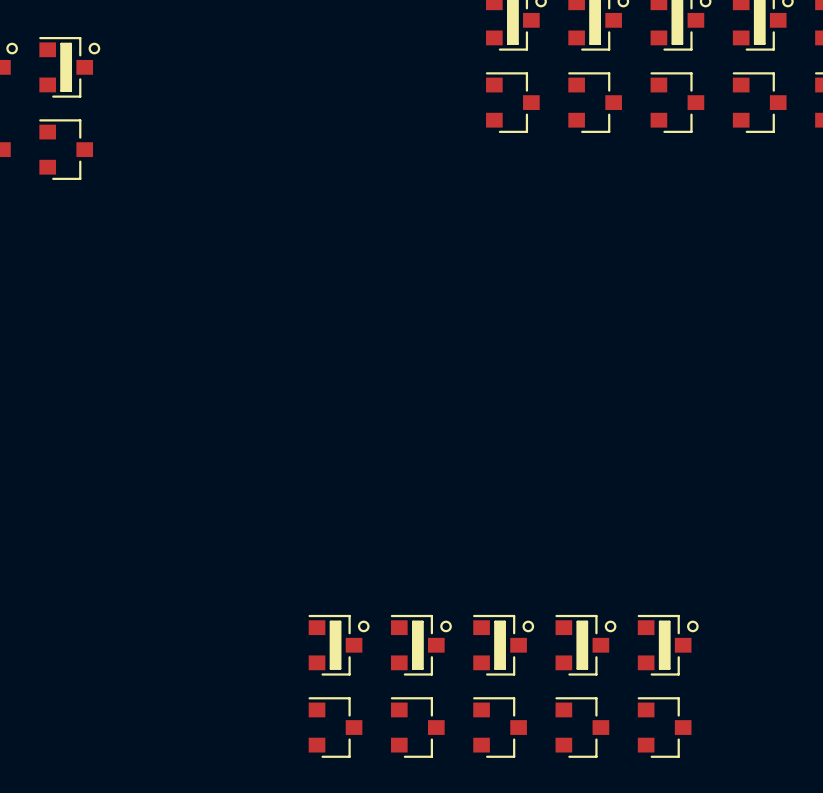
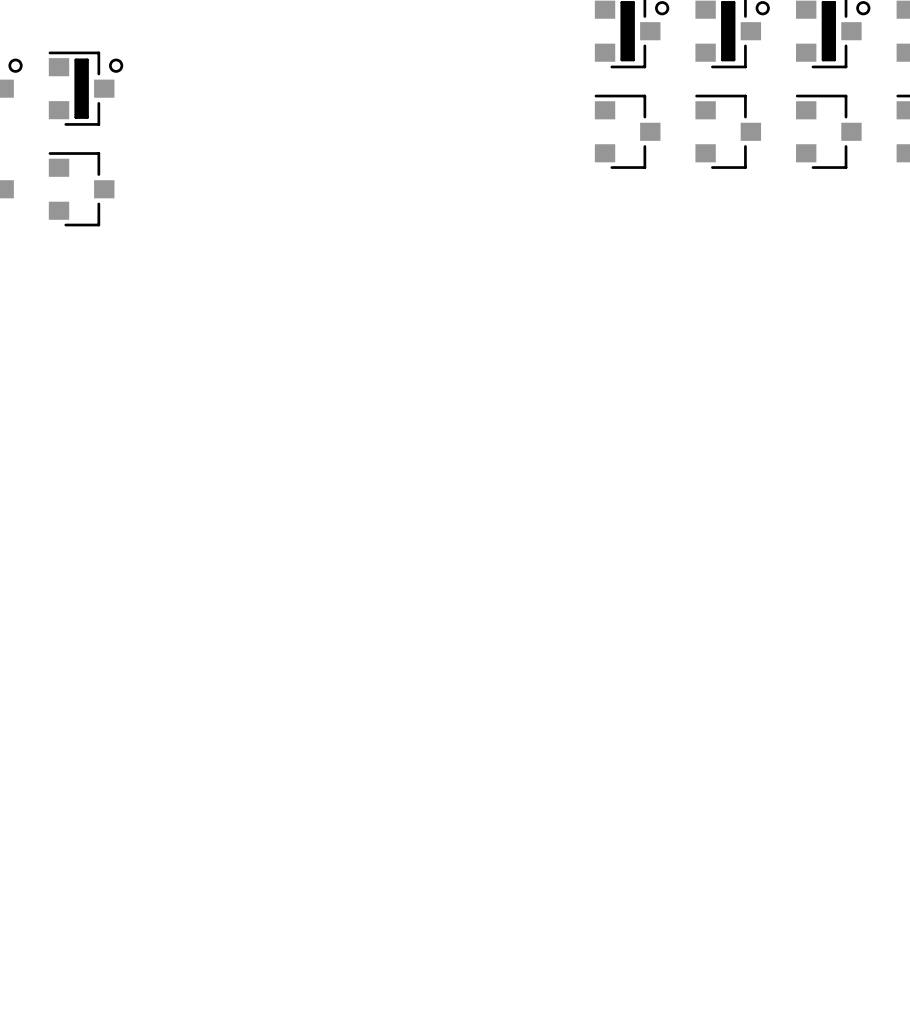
part: (339, 645) -> none
part: (421, 645) -> none
part: (503, 645) -> none
part: (585, 645) -> none
part: (668, 645) -> none
part: (335, 727) -> none
part: (417, 727) -> none
part: (500, 727) -> none
part: (582, 727) -> none
part: (664, 727) -> none

